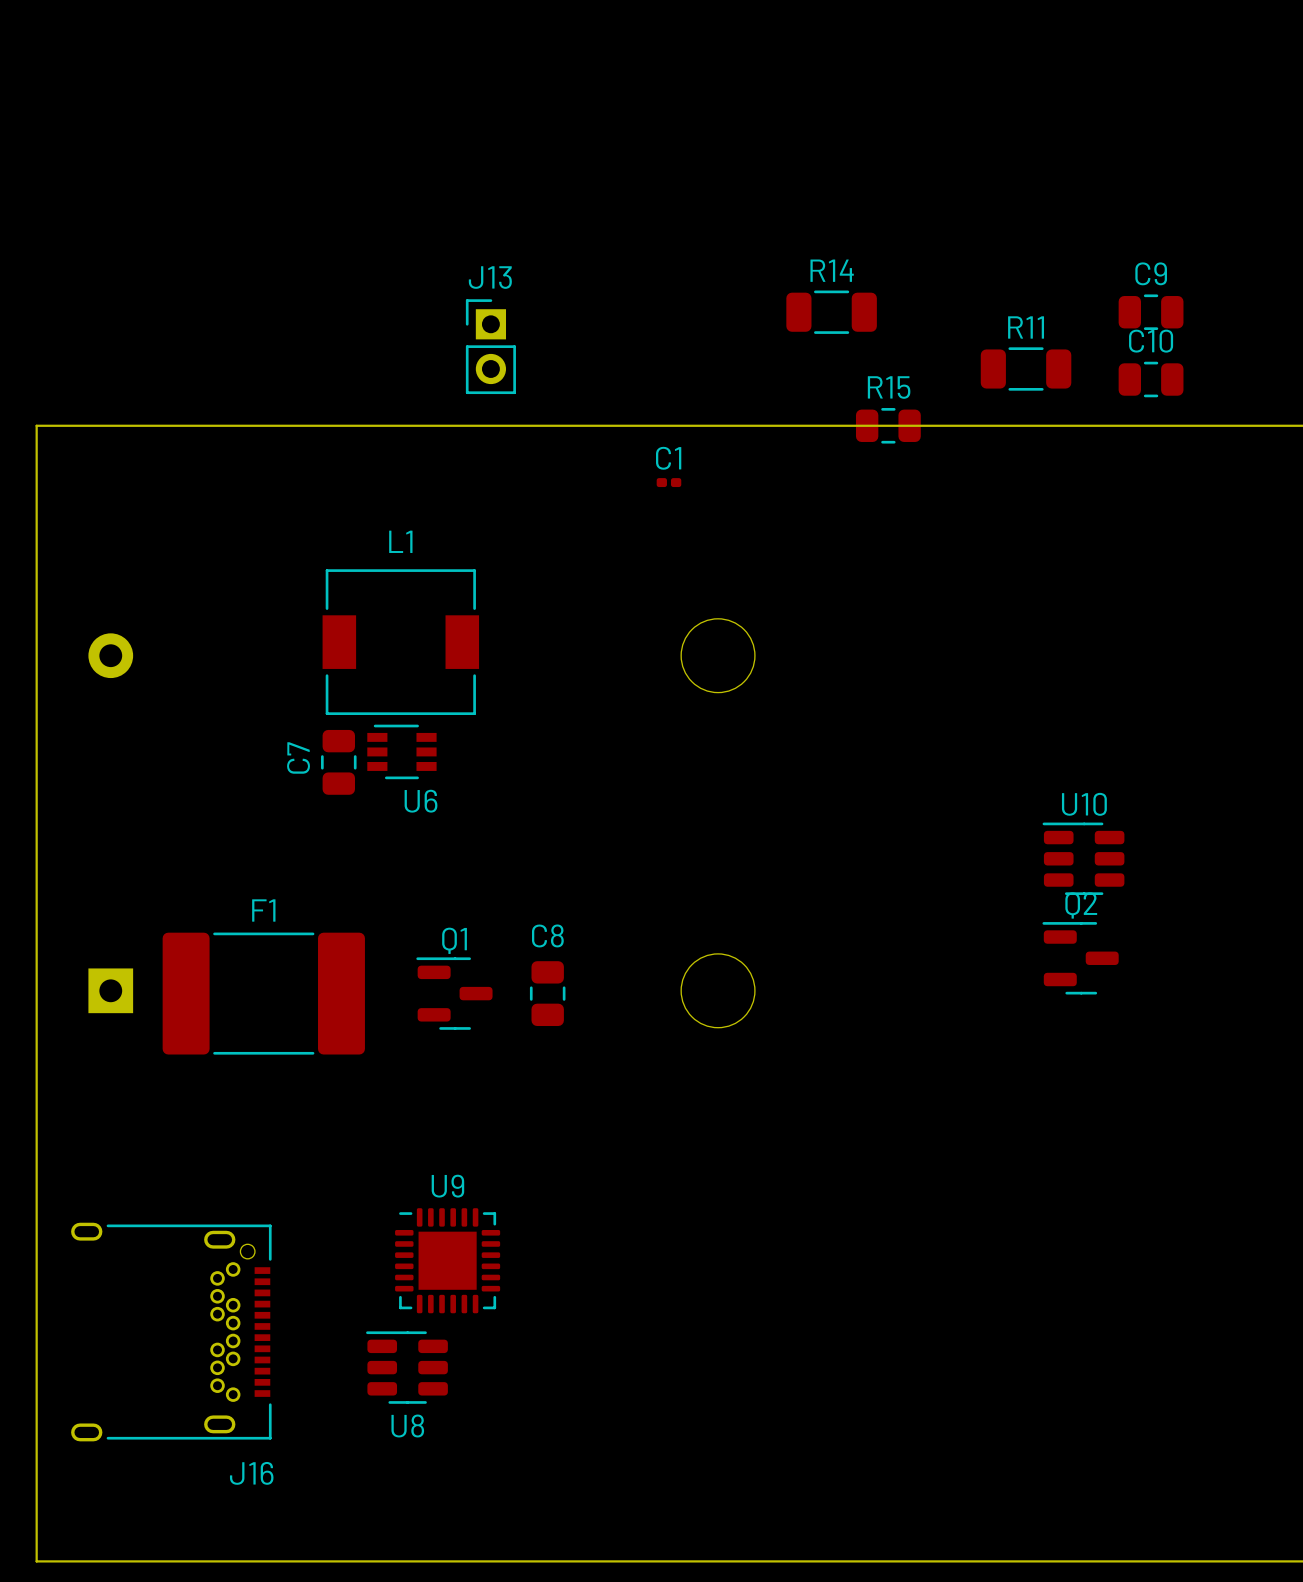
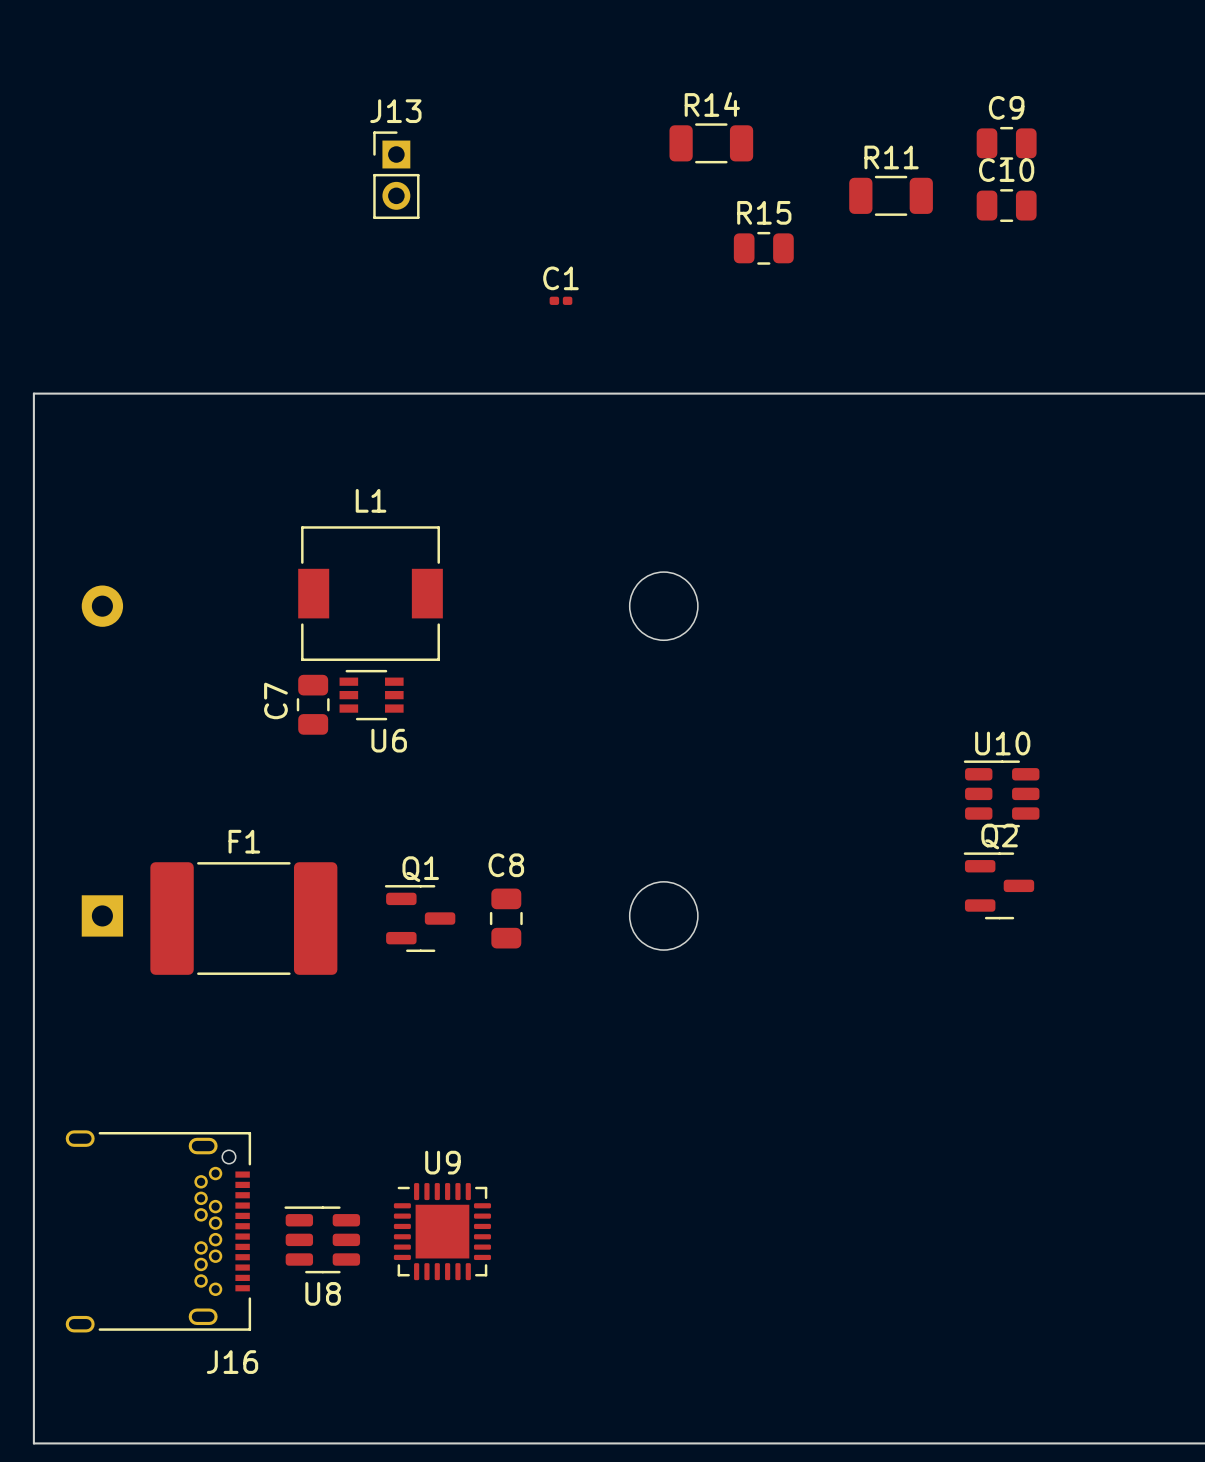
R14 position: (831, 312) -> (711, 143)
C9 position: (1151, 312) -> (1006, 143)
J13 position: (490, 346) -> (396, 175)
R11 position: (1026, 369) -> (891, 195)
C10 position: (1151, 379) -> (1006, 205)
R15 position: (888, 425) -> (763, 248)
C1 position: (668, 482) -> (560, 300)
U9 position: (447, 1260) -> (442, 1231)
U8 position: (406, 1367) -> (322, 1239)

